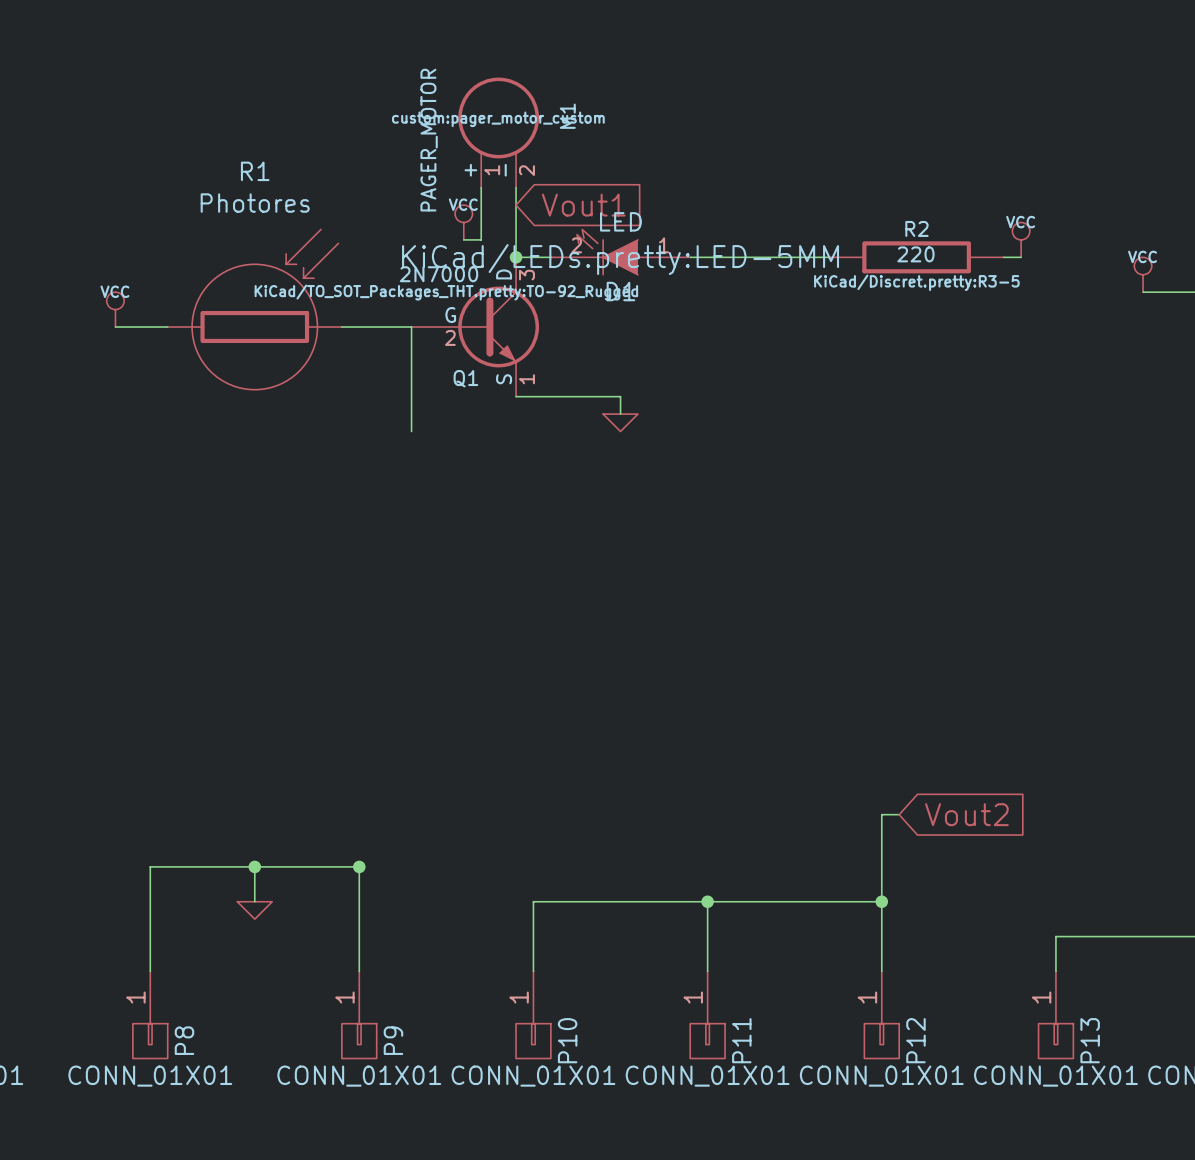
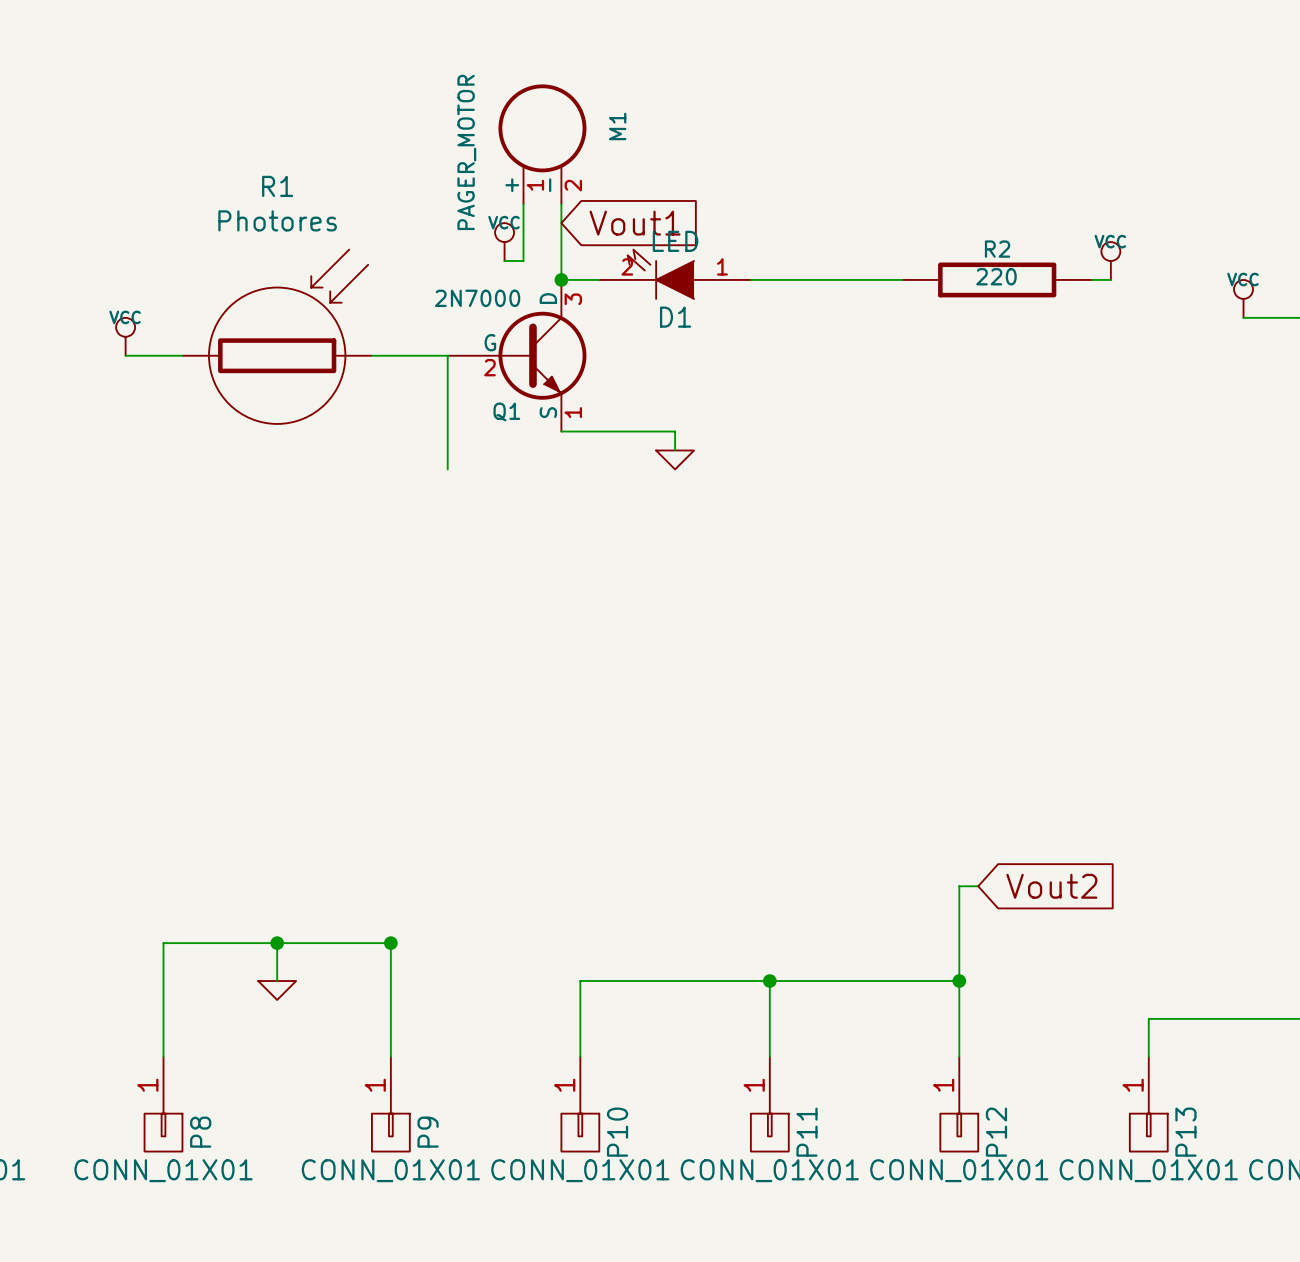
M1 text: custom:pager_motor_custom (498, 119) -> none
D1 text: KiCad/LEDs.pretty:LED-5MM (620, 259) -> none
R2 text: KiCad/Discret.pretty:R3-5 (916, 282) -> none
Q1 text: KiCad/TO_SOT_Packages_THT.pretty:TO-92_Rugged (446, 292) -> none

